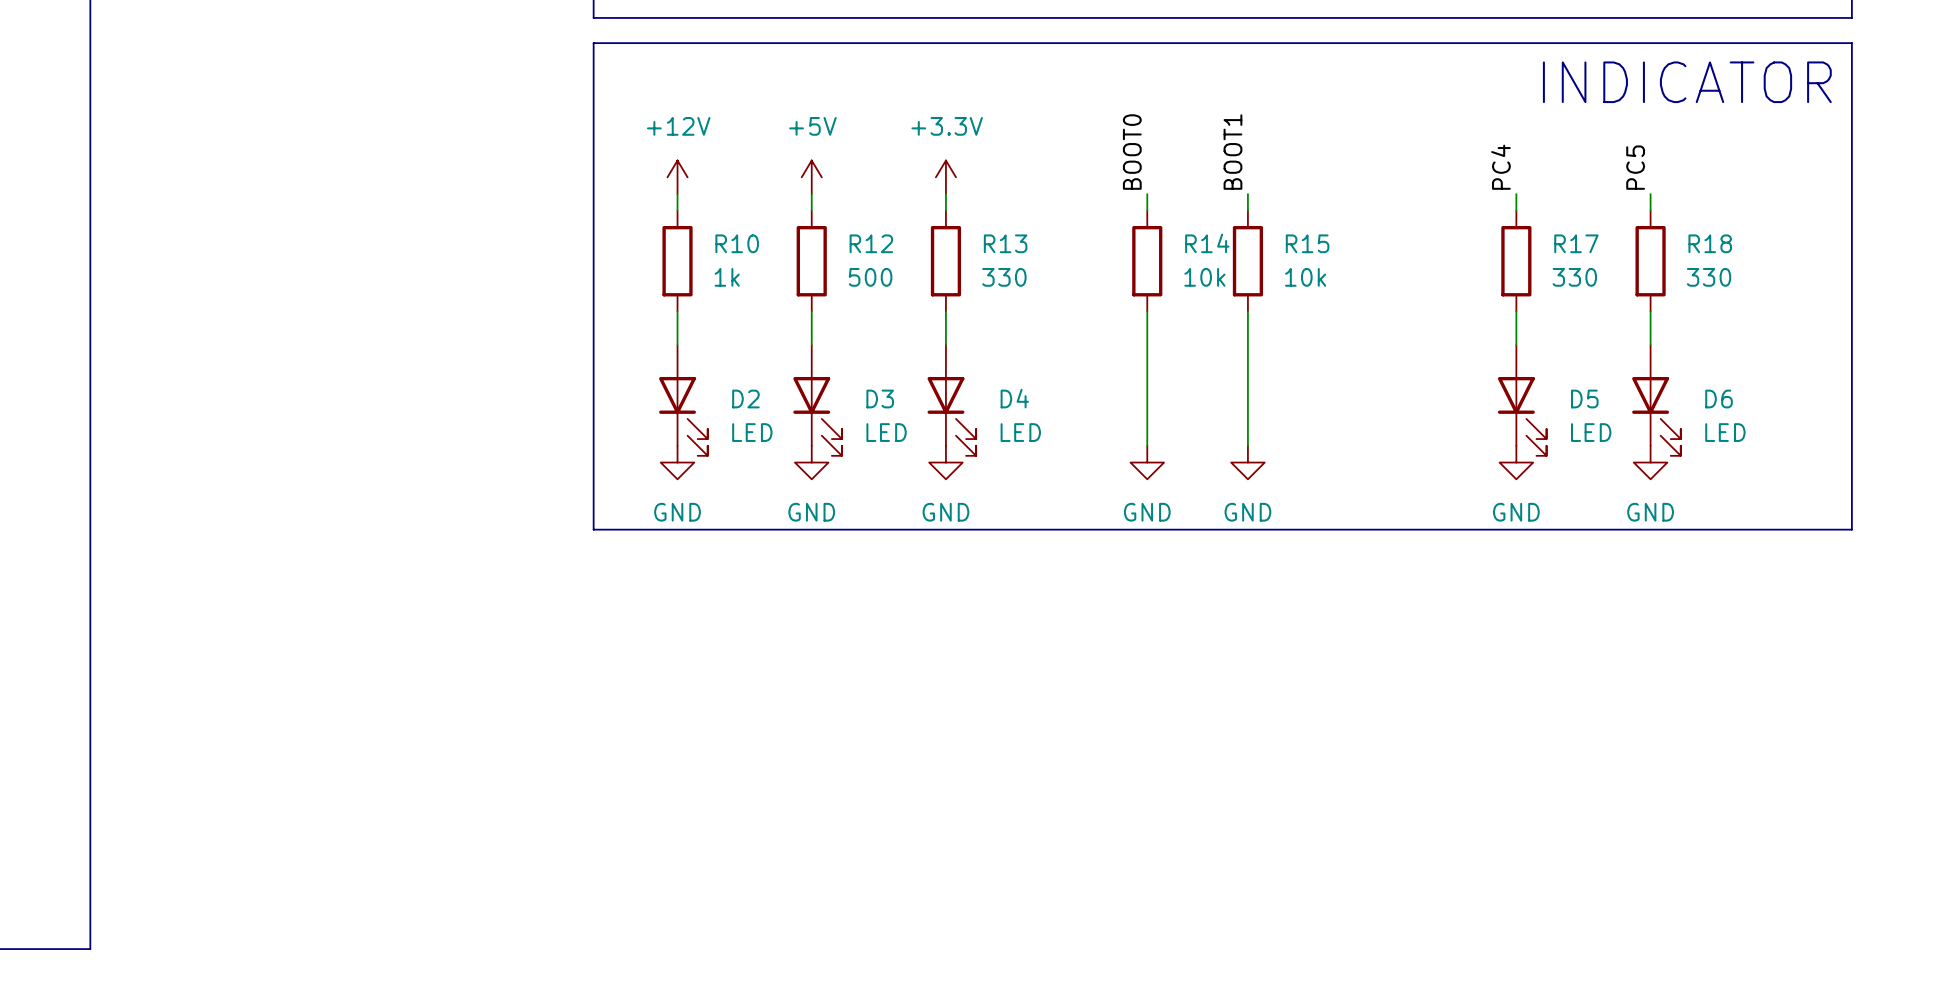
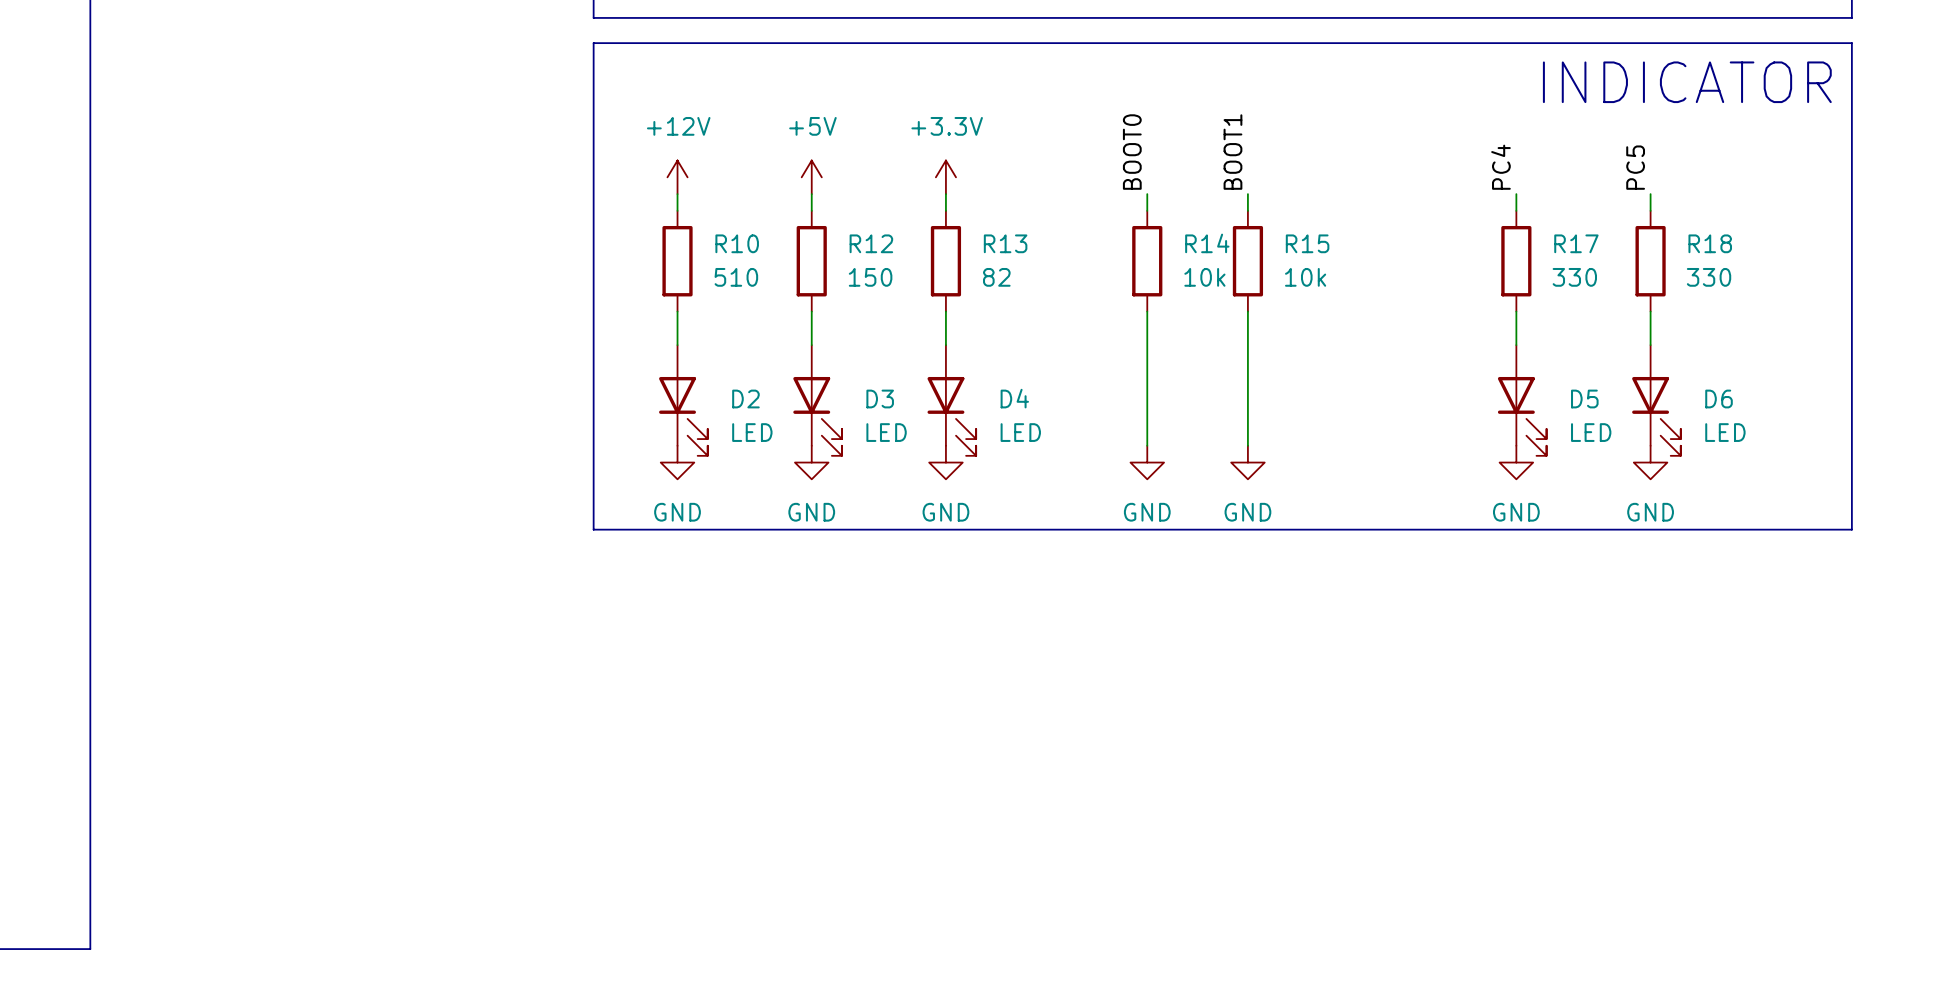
R10 value: 1k (727, 277) -> 510 (736, 277)
R12 value: 500 (870, 277) -> 150 (870, 277)
R13 value: 330 (1004, 277) -> 82 (996, 277)

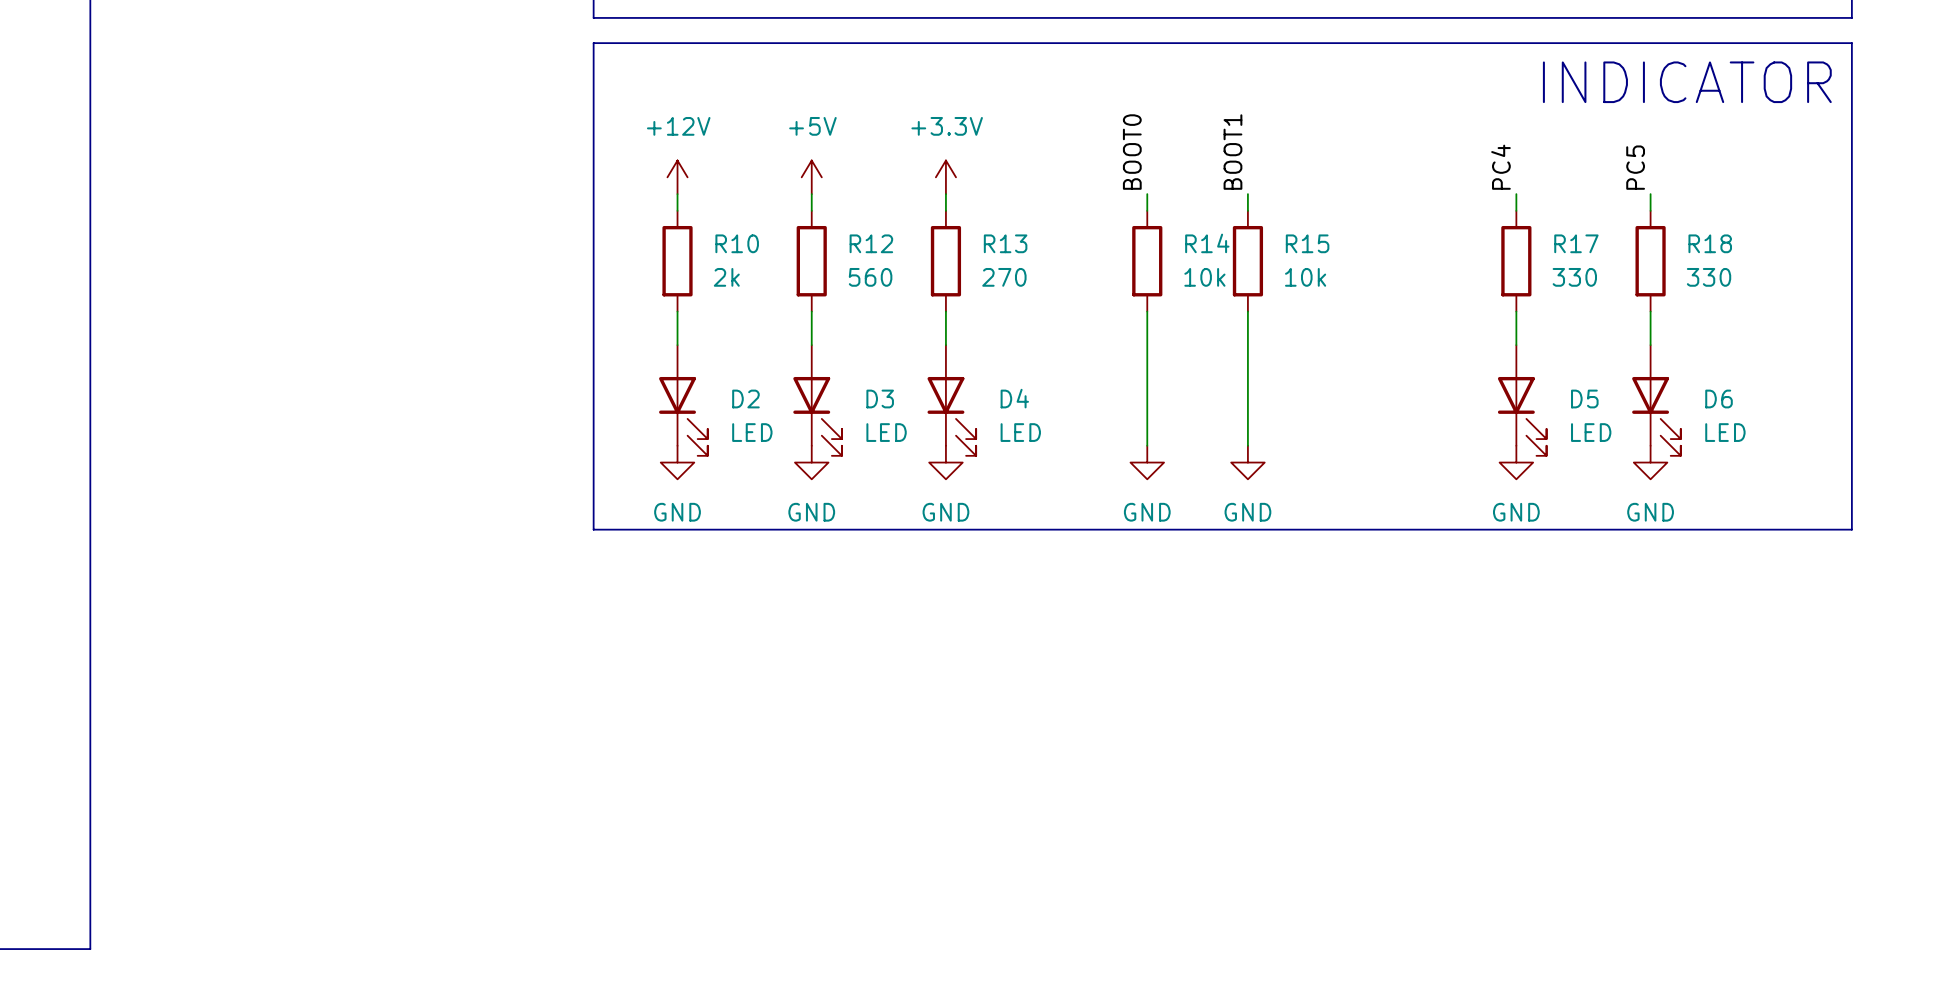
R10 value: 510 (736, 277) -> 2k (726, 277)
R12 value: 150 (870, 277) -> 560 (870, 277)
R13 value: 82 (996, 277) -> 270 (1004, 277)

